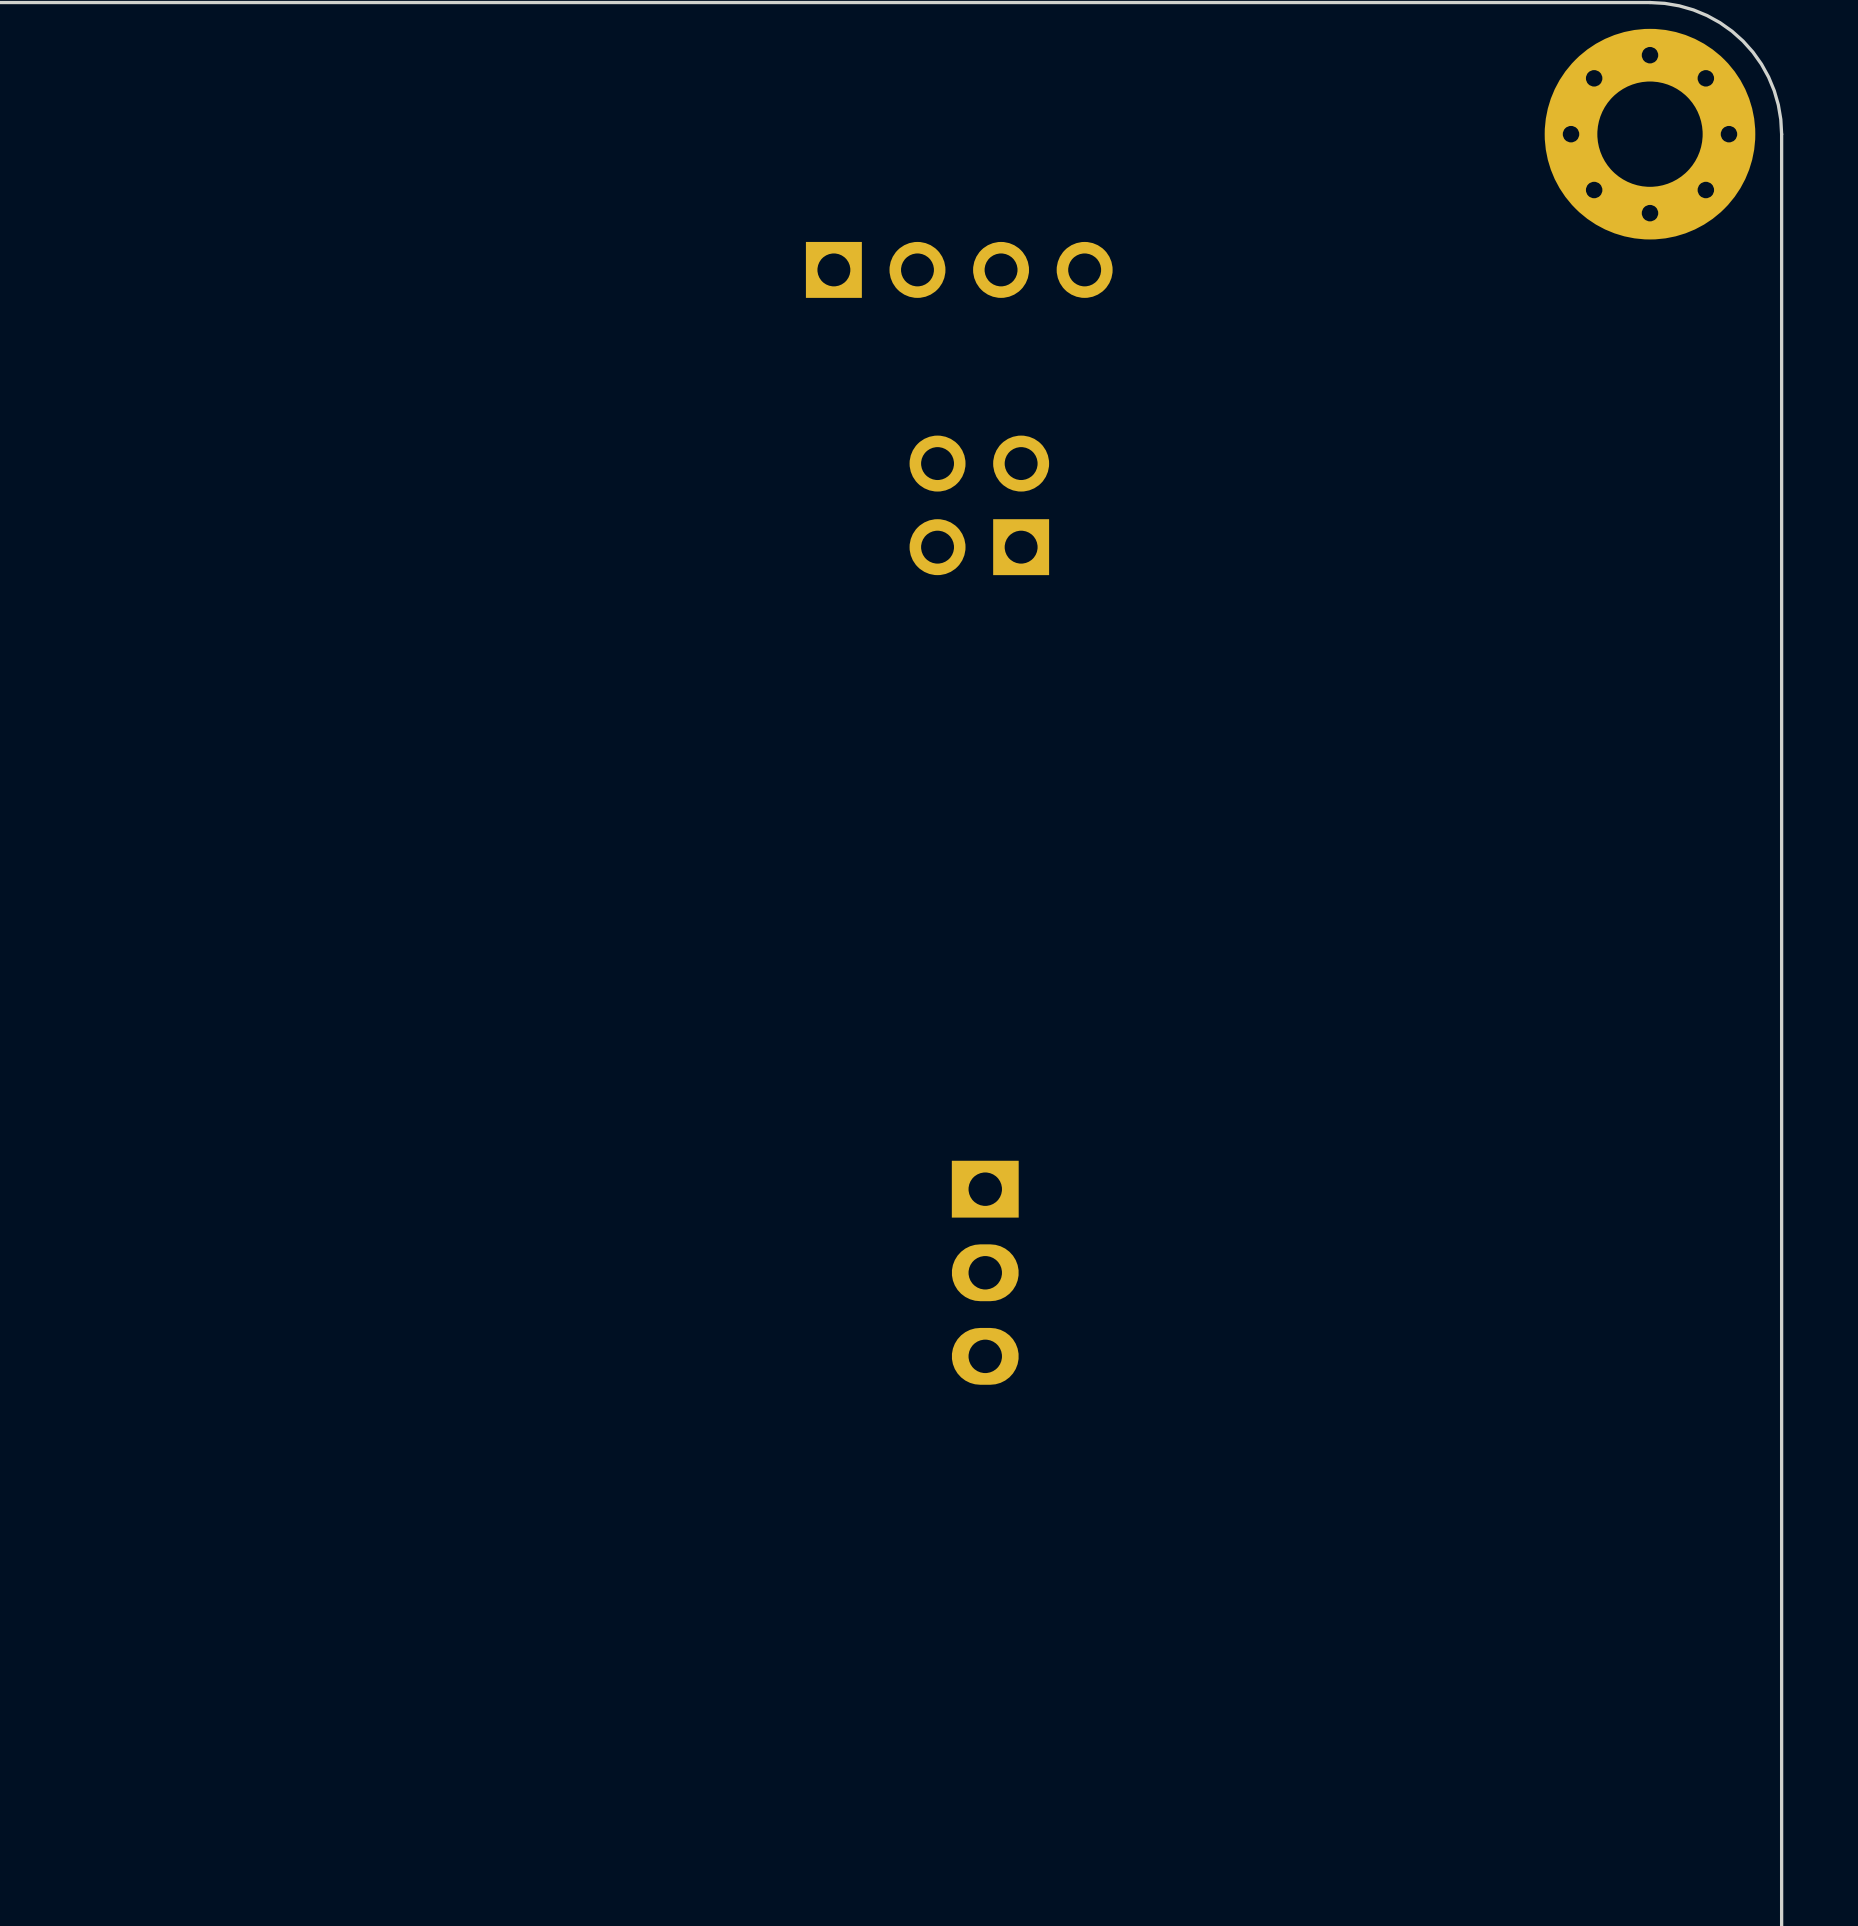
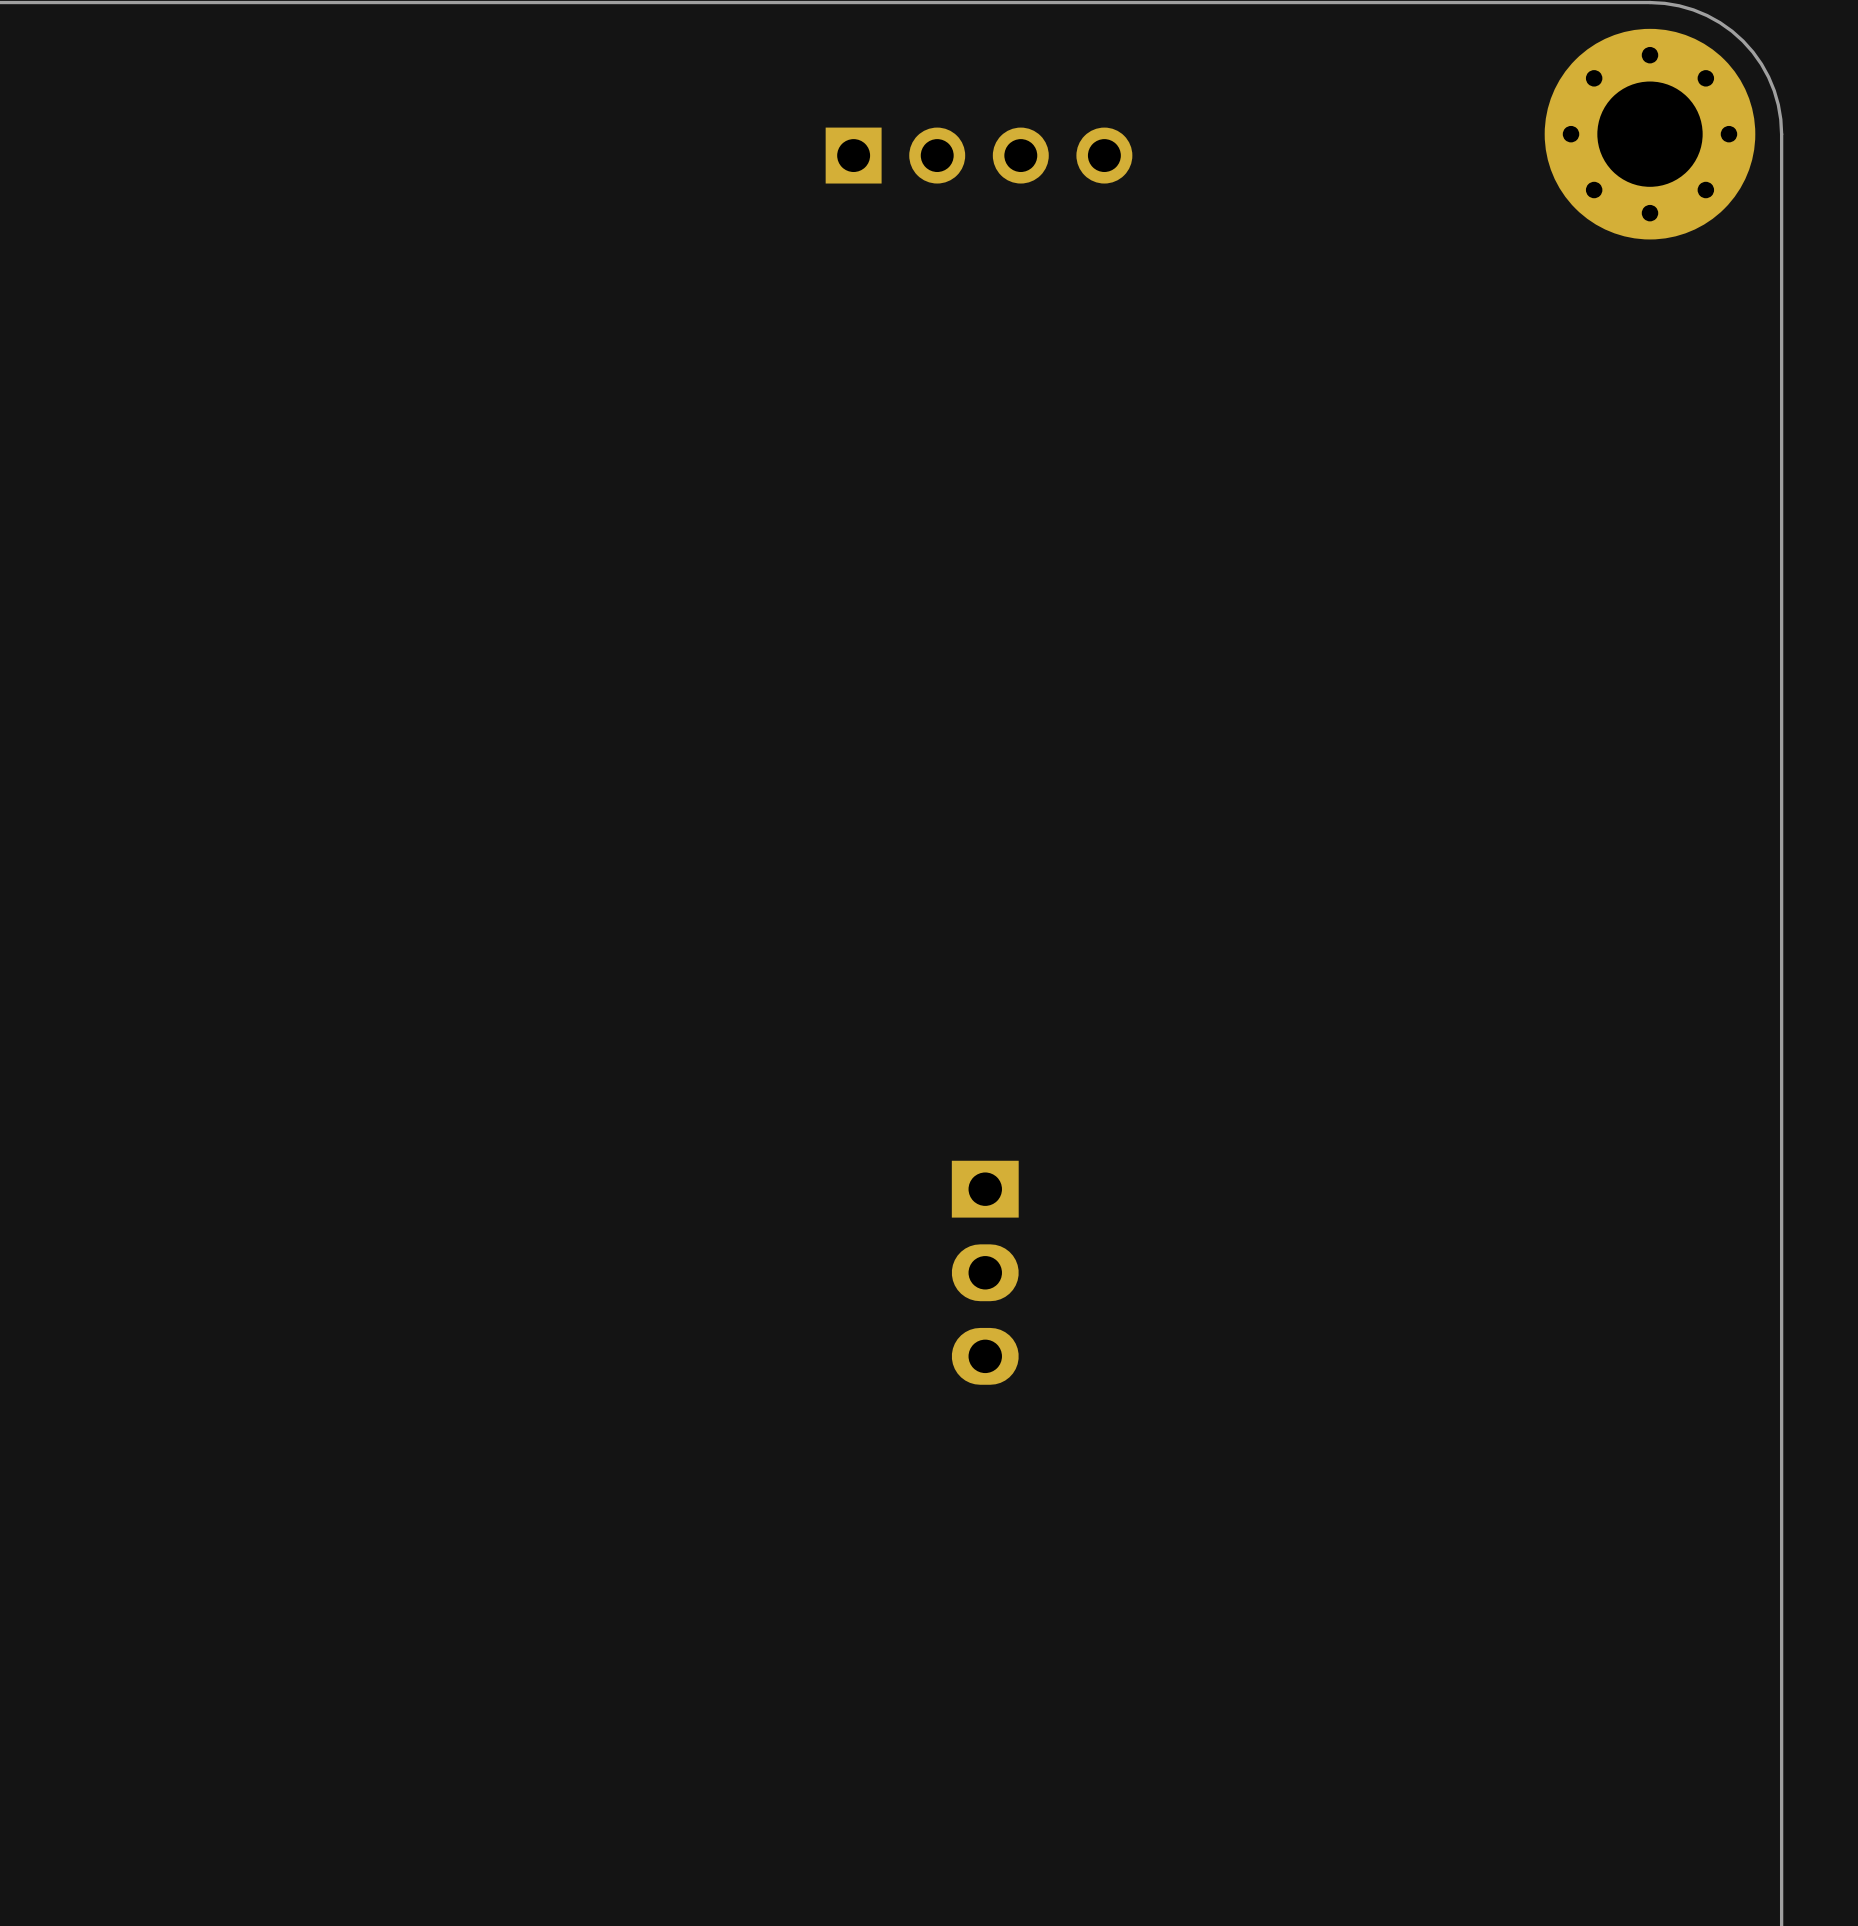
part position: (959, 269) -> (979, 155)
part: (979, 505) -> none

